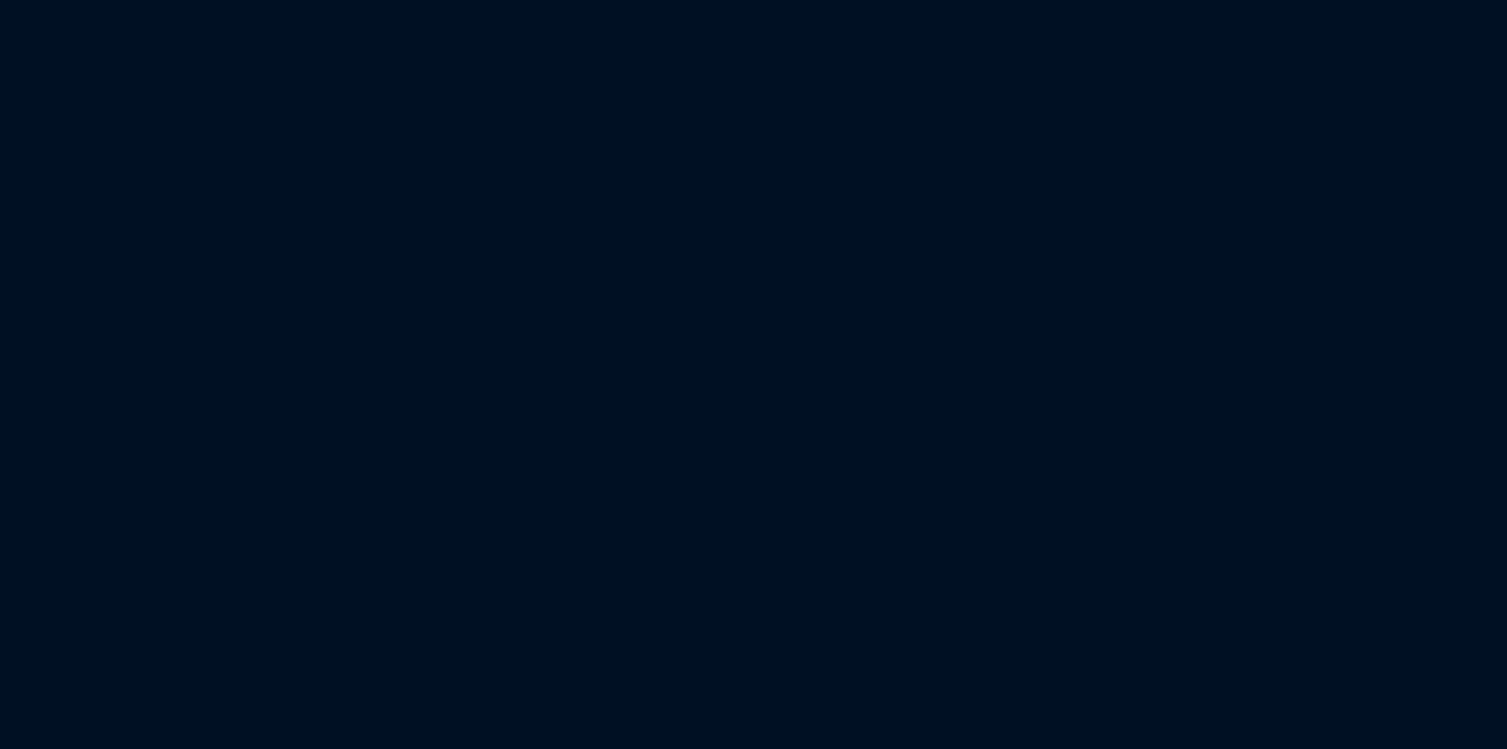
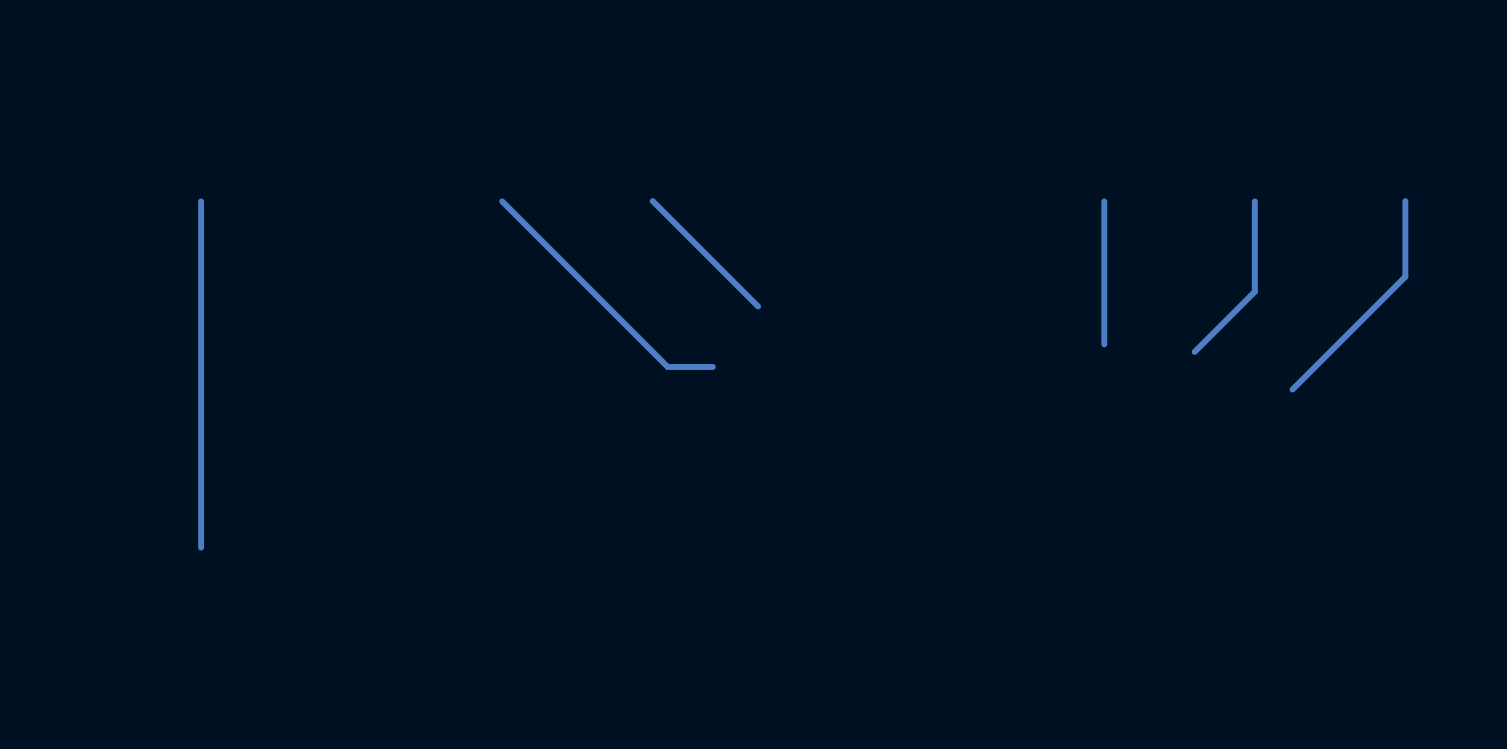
bottom track: none -> (201, 201) (201, 547)
bottom track: none -> (502, 201) (667, 366) (712, 366)
bottom track: none -> (652, 201) (758, 306)
bottom track: none -> (1104, 201) (1104, 344)
bottom track: none -> (1254, 201) (1254, 291) (1194, 351)
bottom track: none -> (1405, 201) (1405, 276) (1292, 389)

